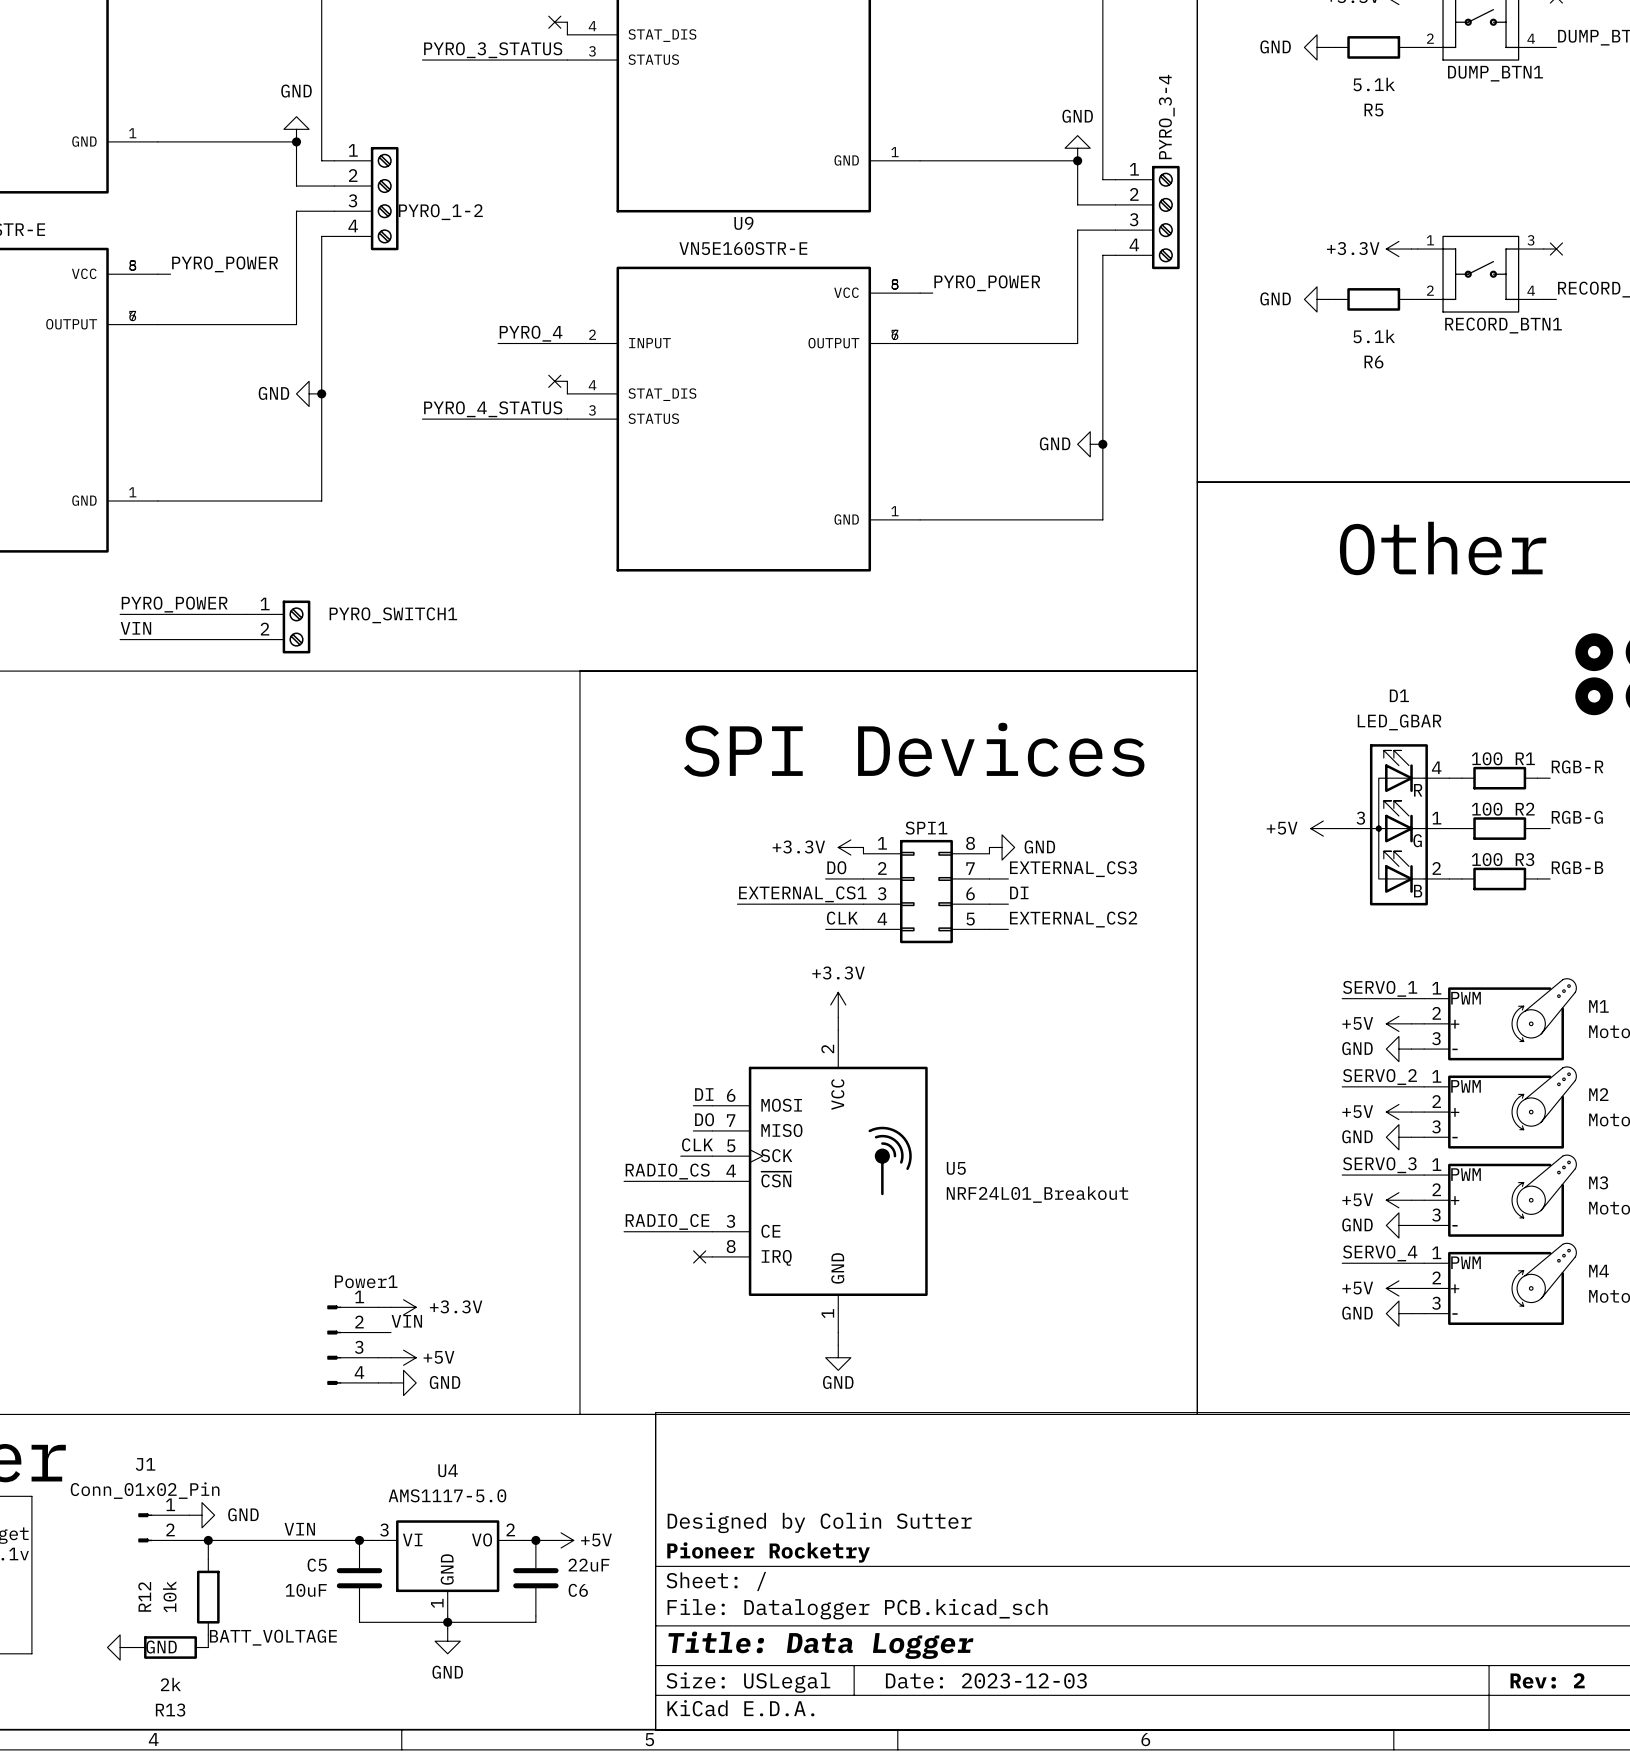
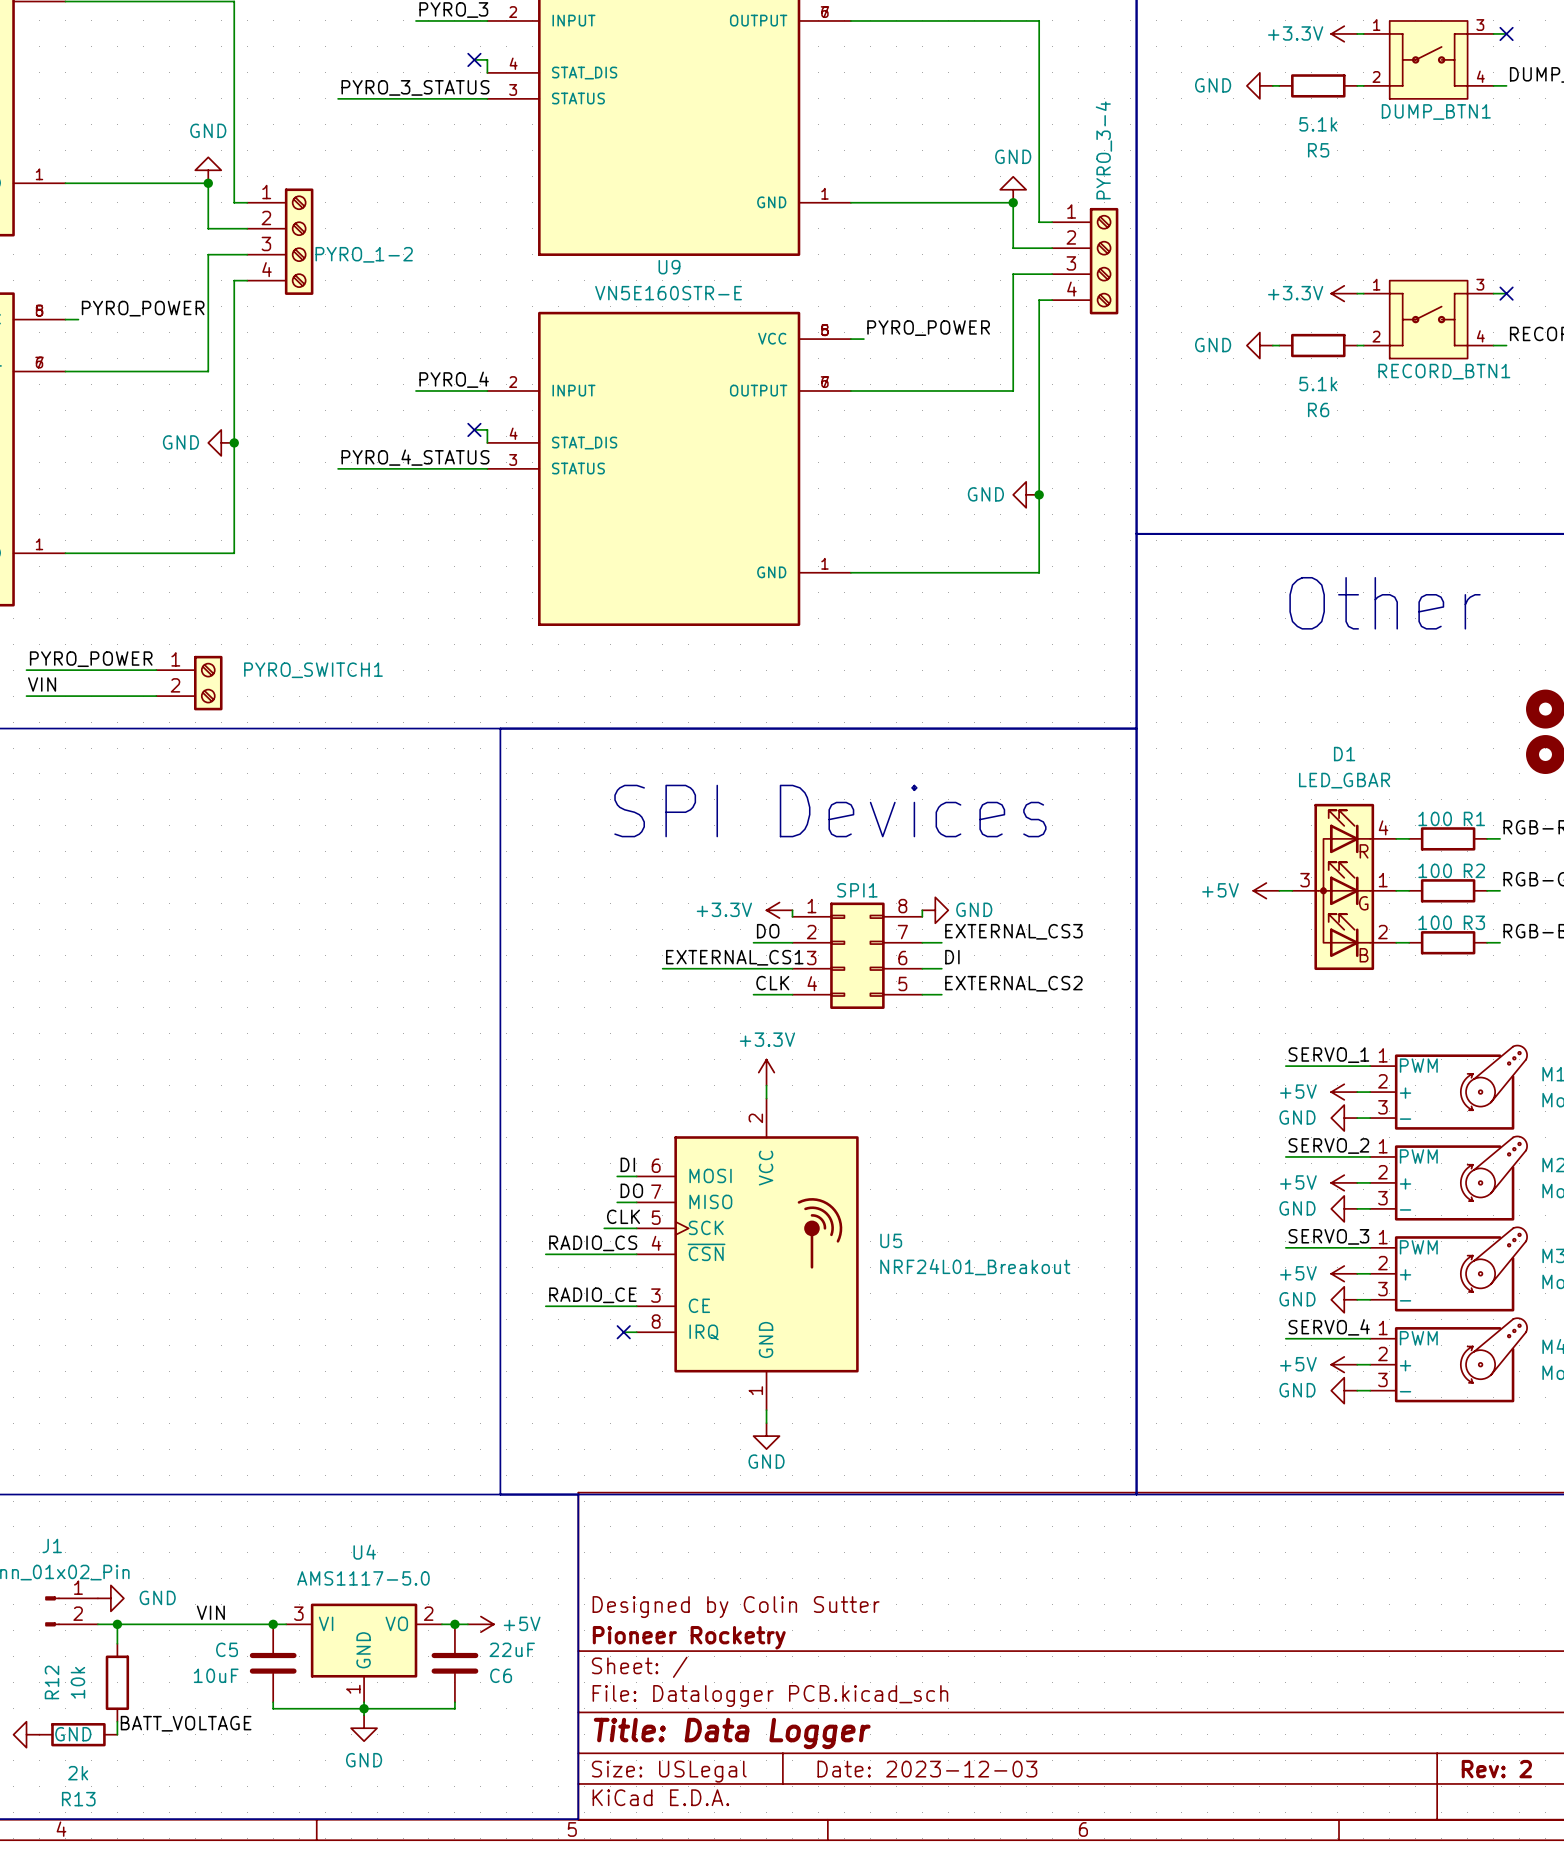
wire: (378, 1307) (391, 1307) -> none
power symbol: +3.3V (403, 1307) -> none
label: VIN (406, 1321) -> none
wire: (378, 1332) (391, 1332) -> none
Power1: (352, 1345) -> none
wire: (378, 1357) (391, 1357) -> none
power symbol: +5V (403, 1357) -> none
wire: (378, 1382) (391, 1382) -> none
power symbol: GND (403, 1382) -> none

